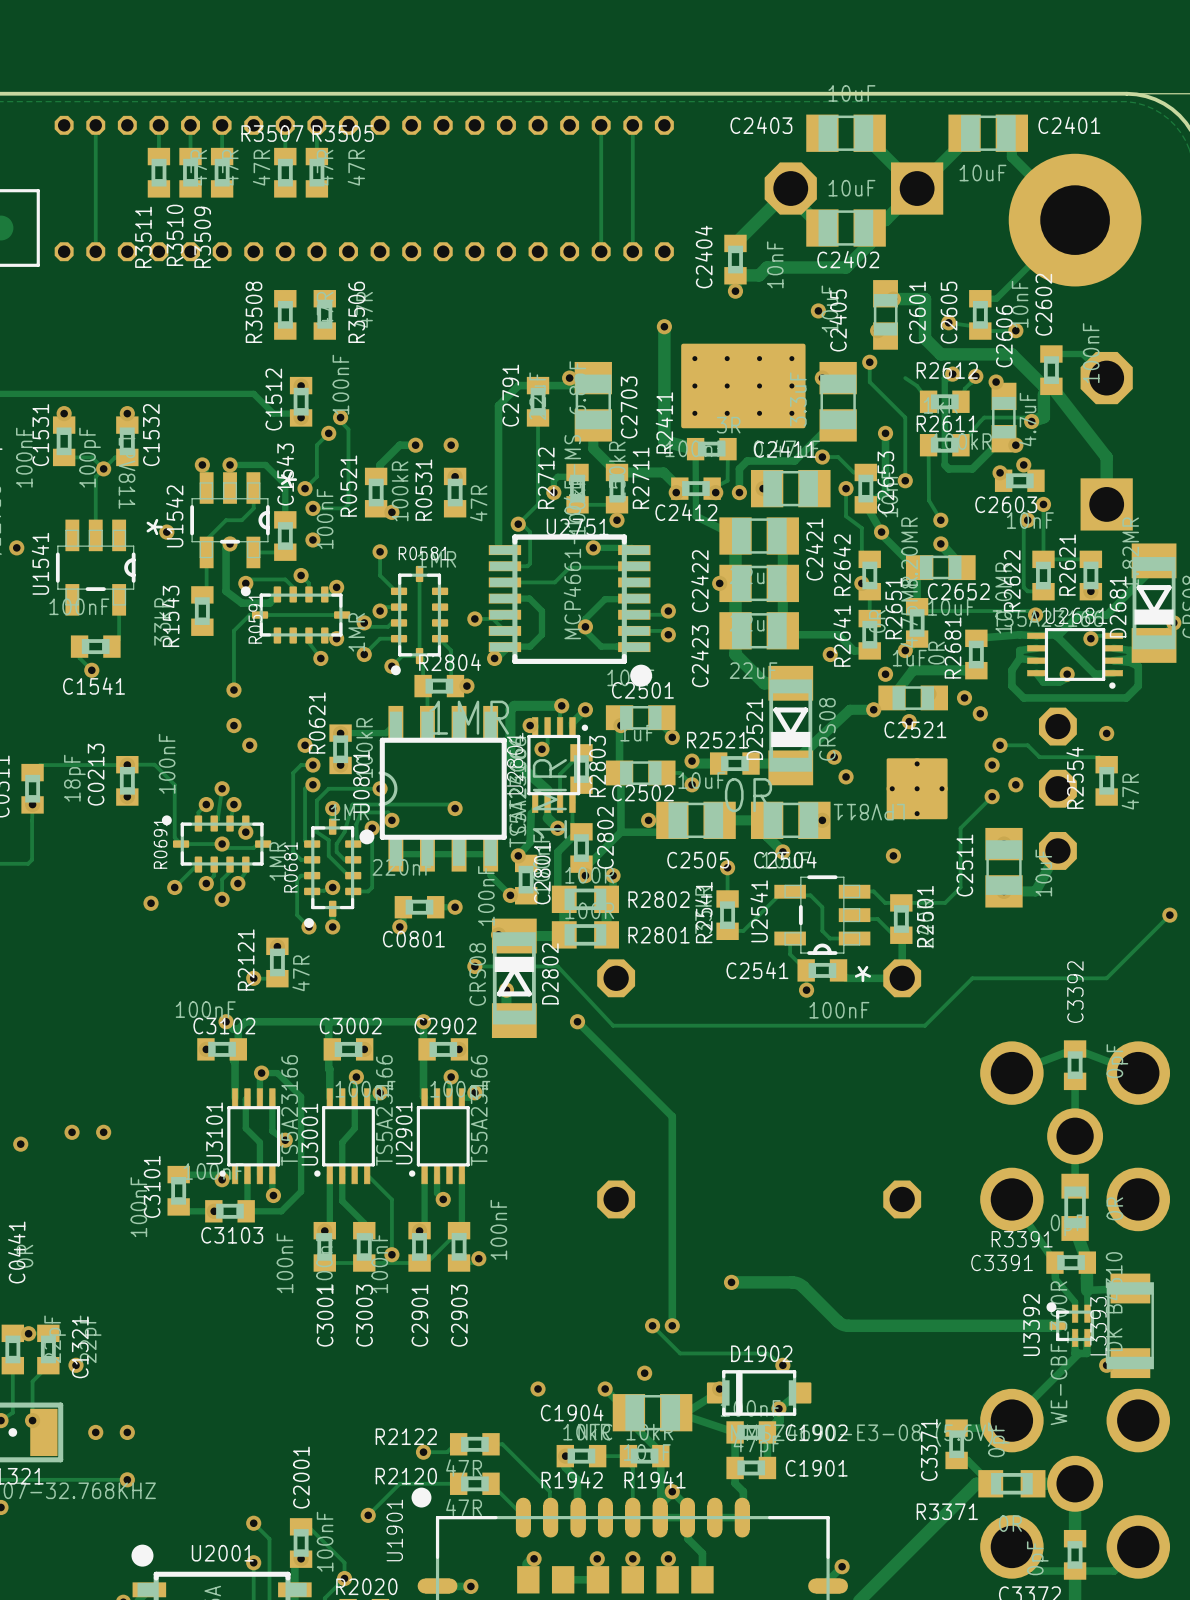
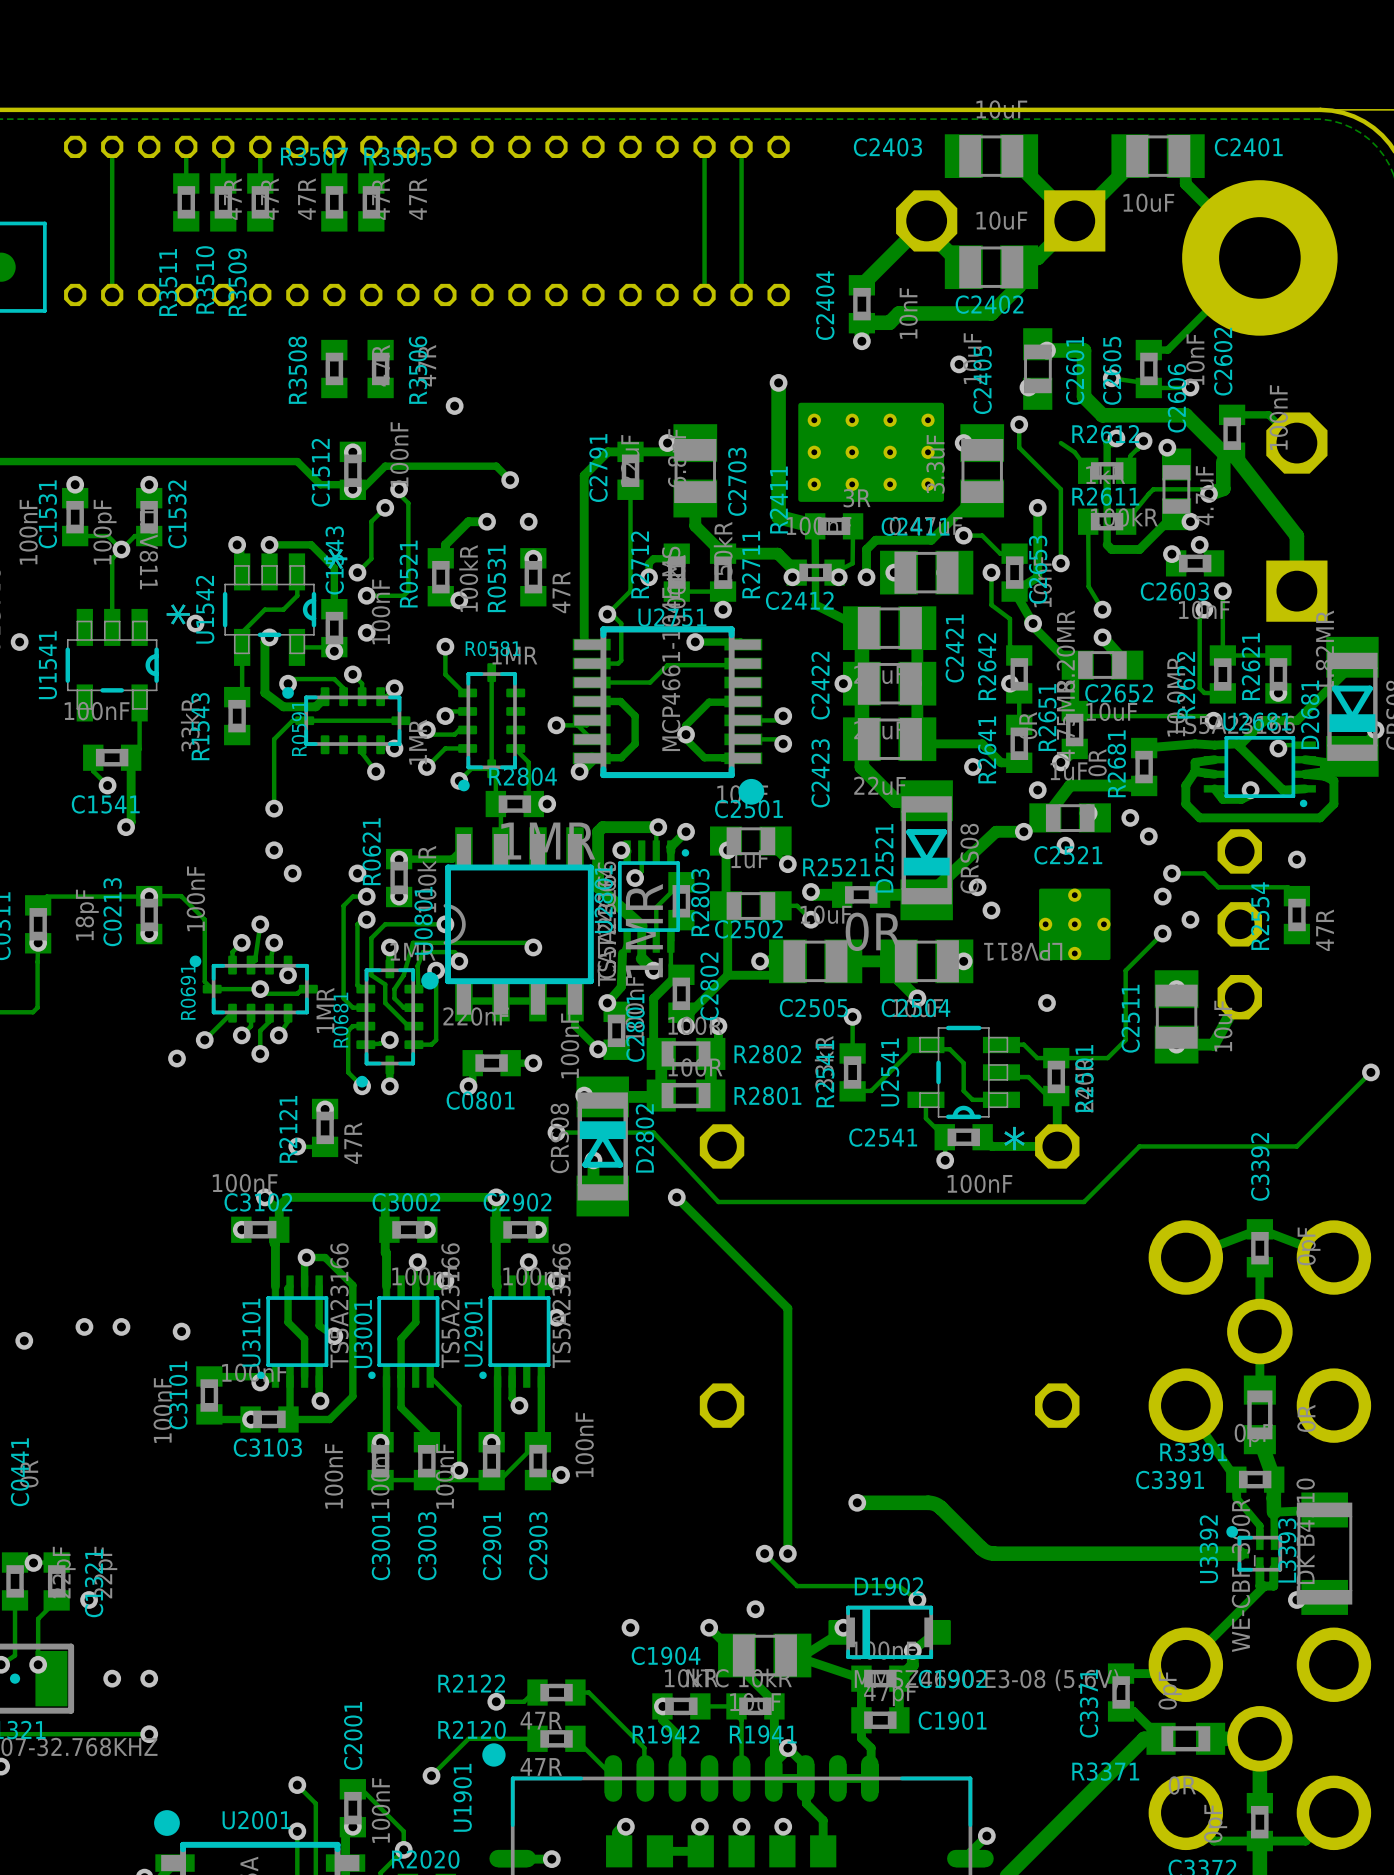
via: none -> (454, 406)
track: none -> (510, 480) (496, 466) (385, 466) (362, 489) (352, 489)
via: none -> (510, 480)
via: none -> (334, 651)
track: none -> (131, 757) (131, 822) (126, 827)
via: none -> (126, 827)
via: none -> (556, 1317)
via: none -> (181, 1331)

